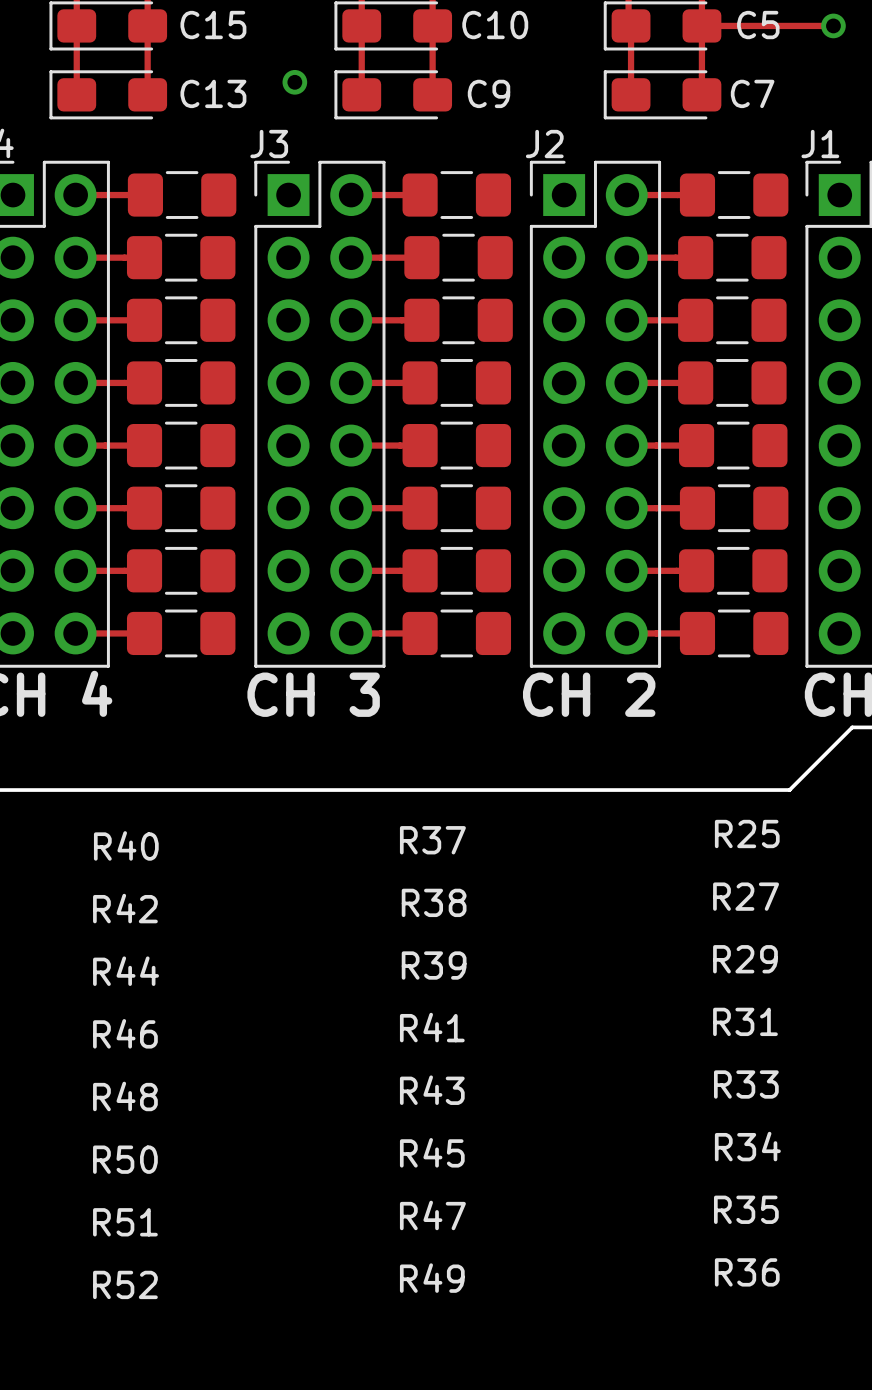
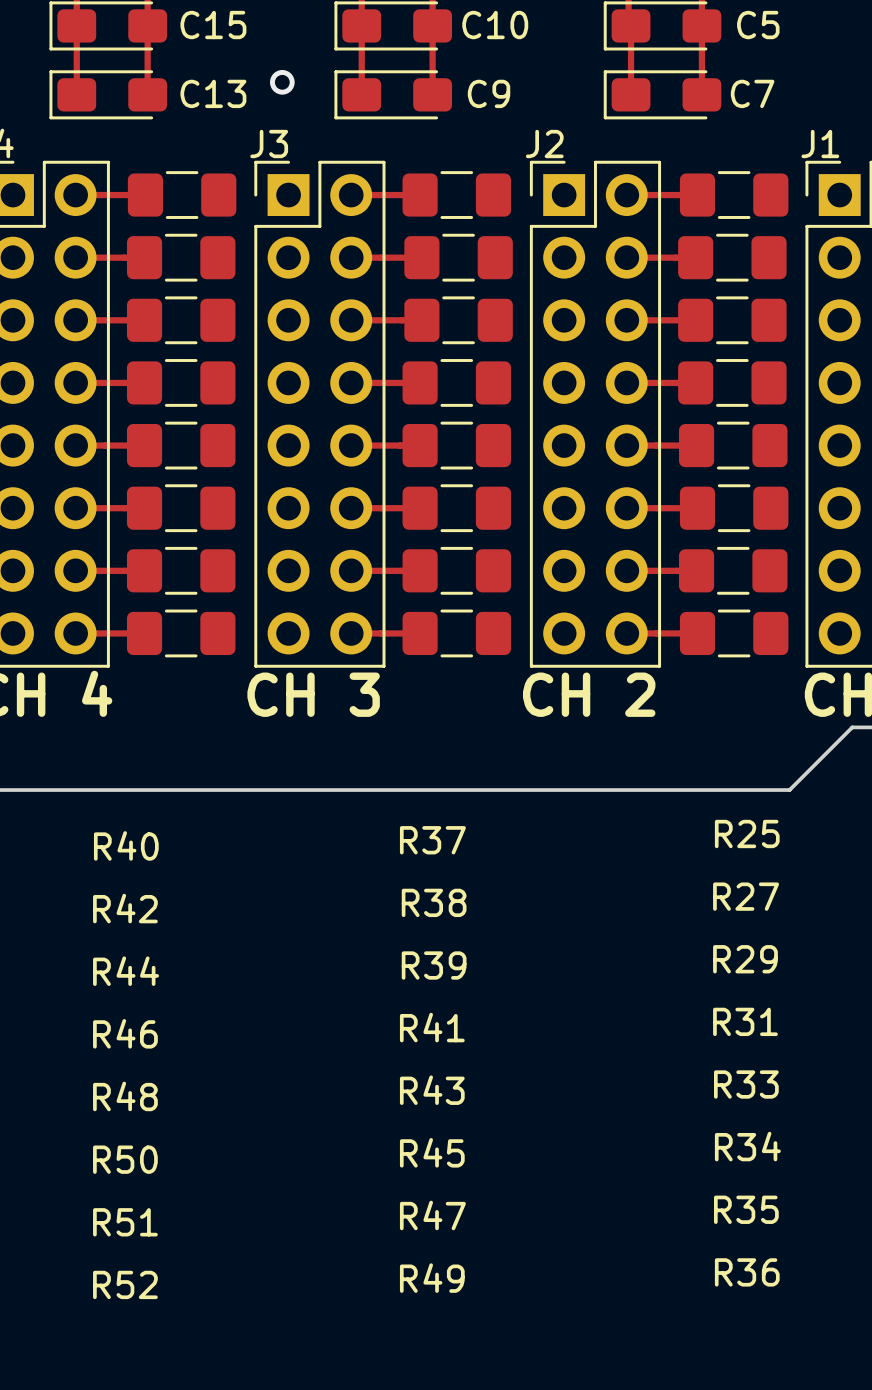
track: (701, 25) (833, 25) -> none
via: (833, 25) -> none
via position: (294, 82) -> (282, 82)

